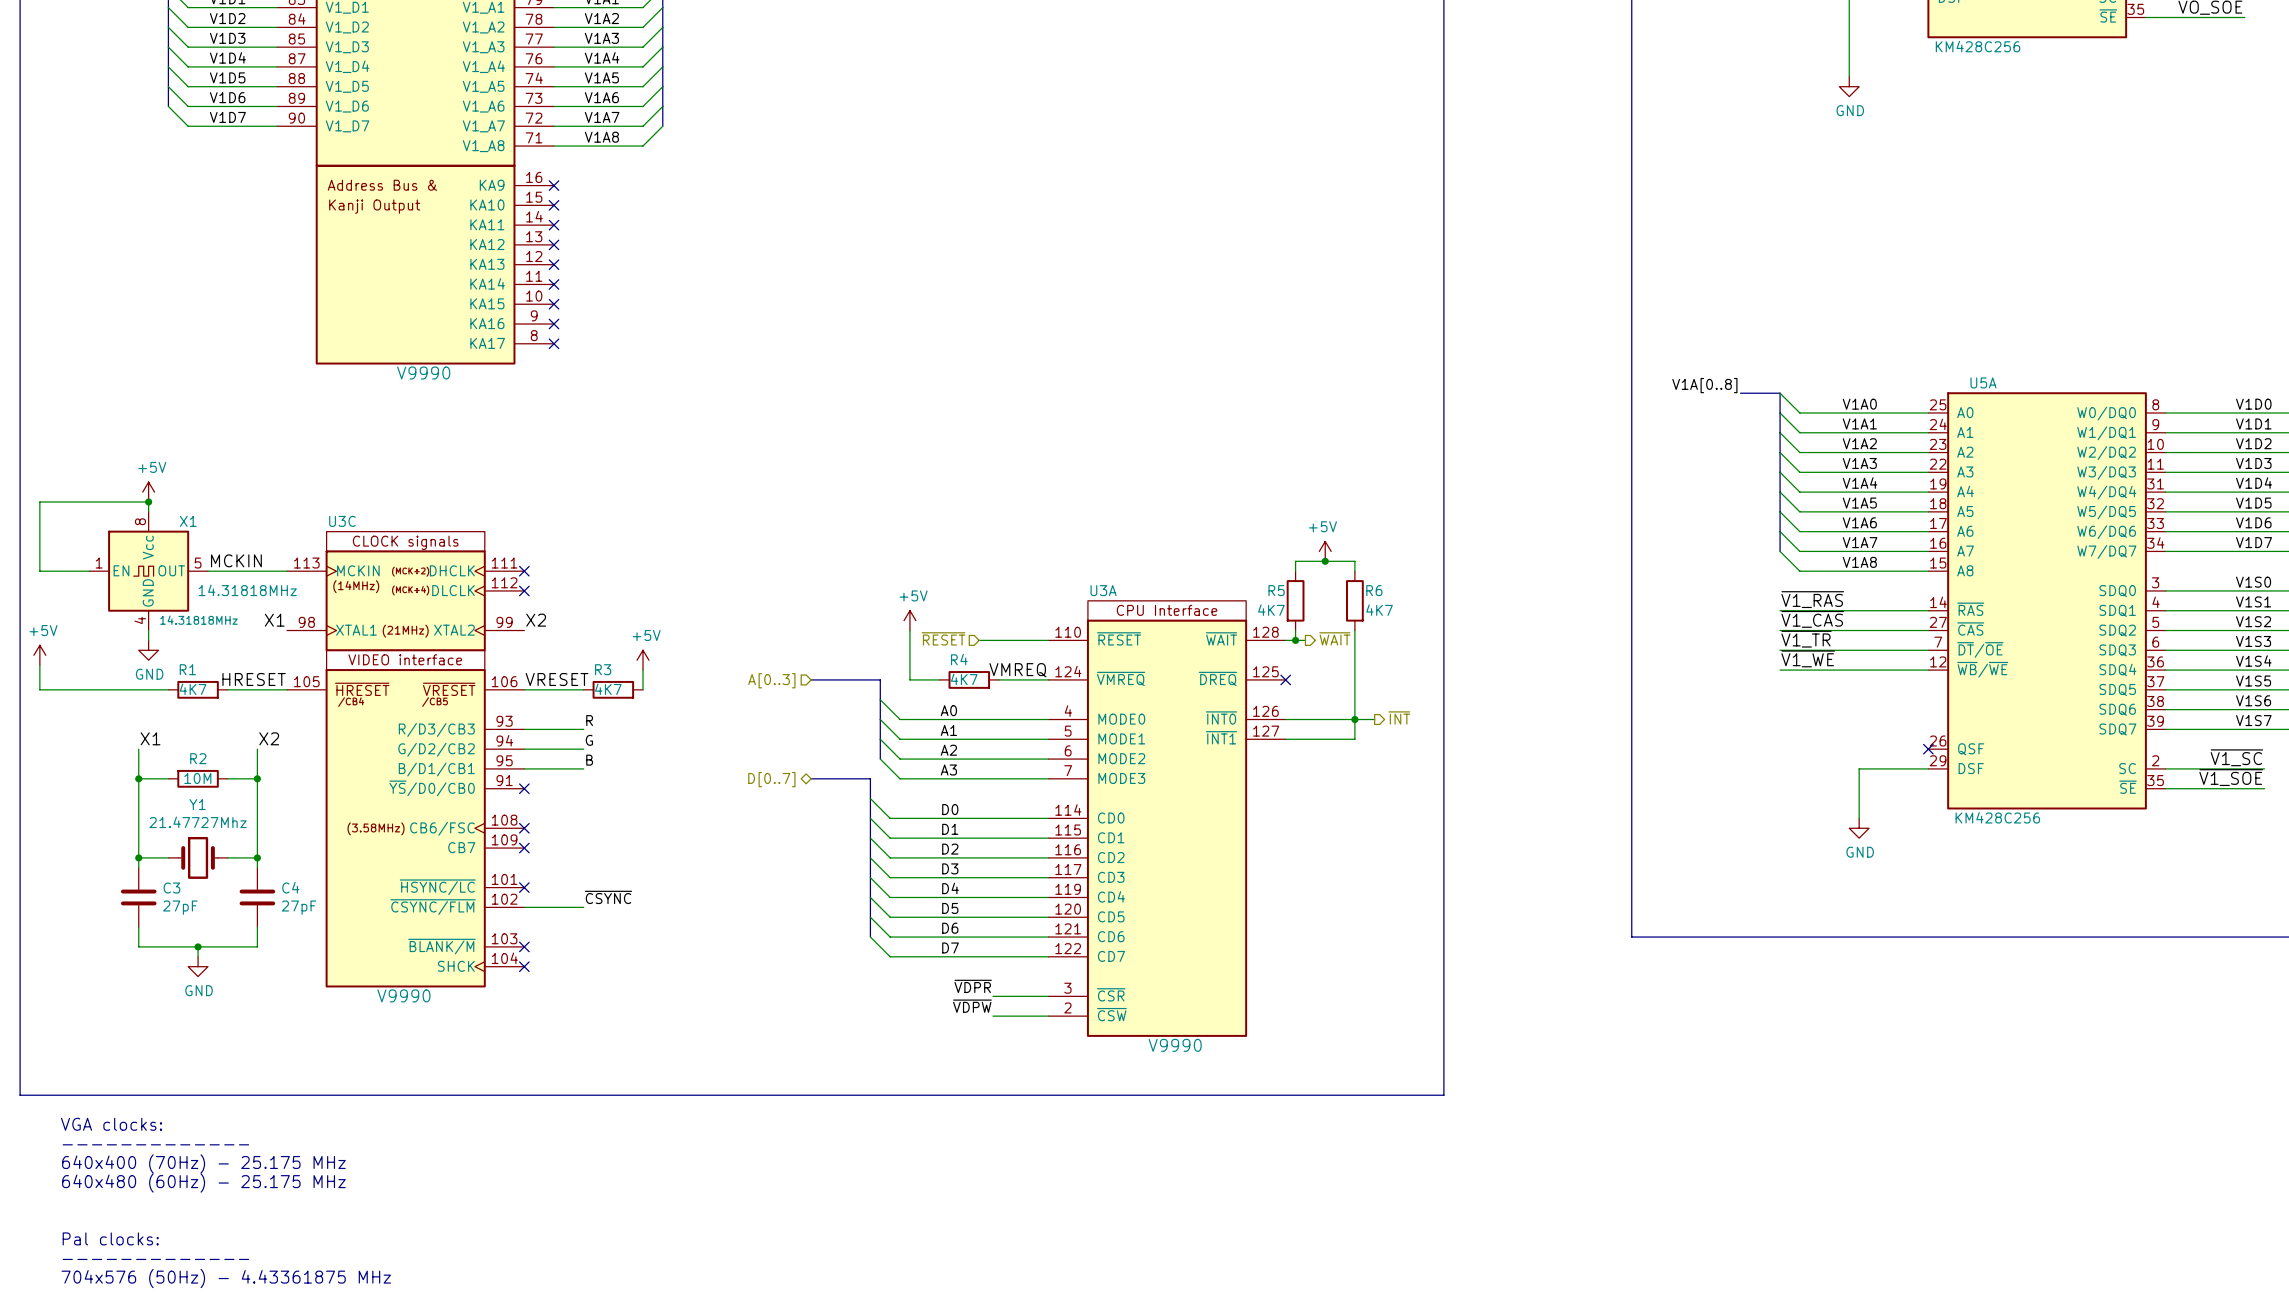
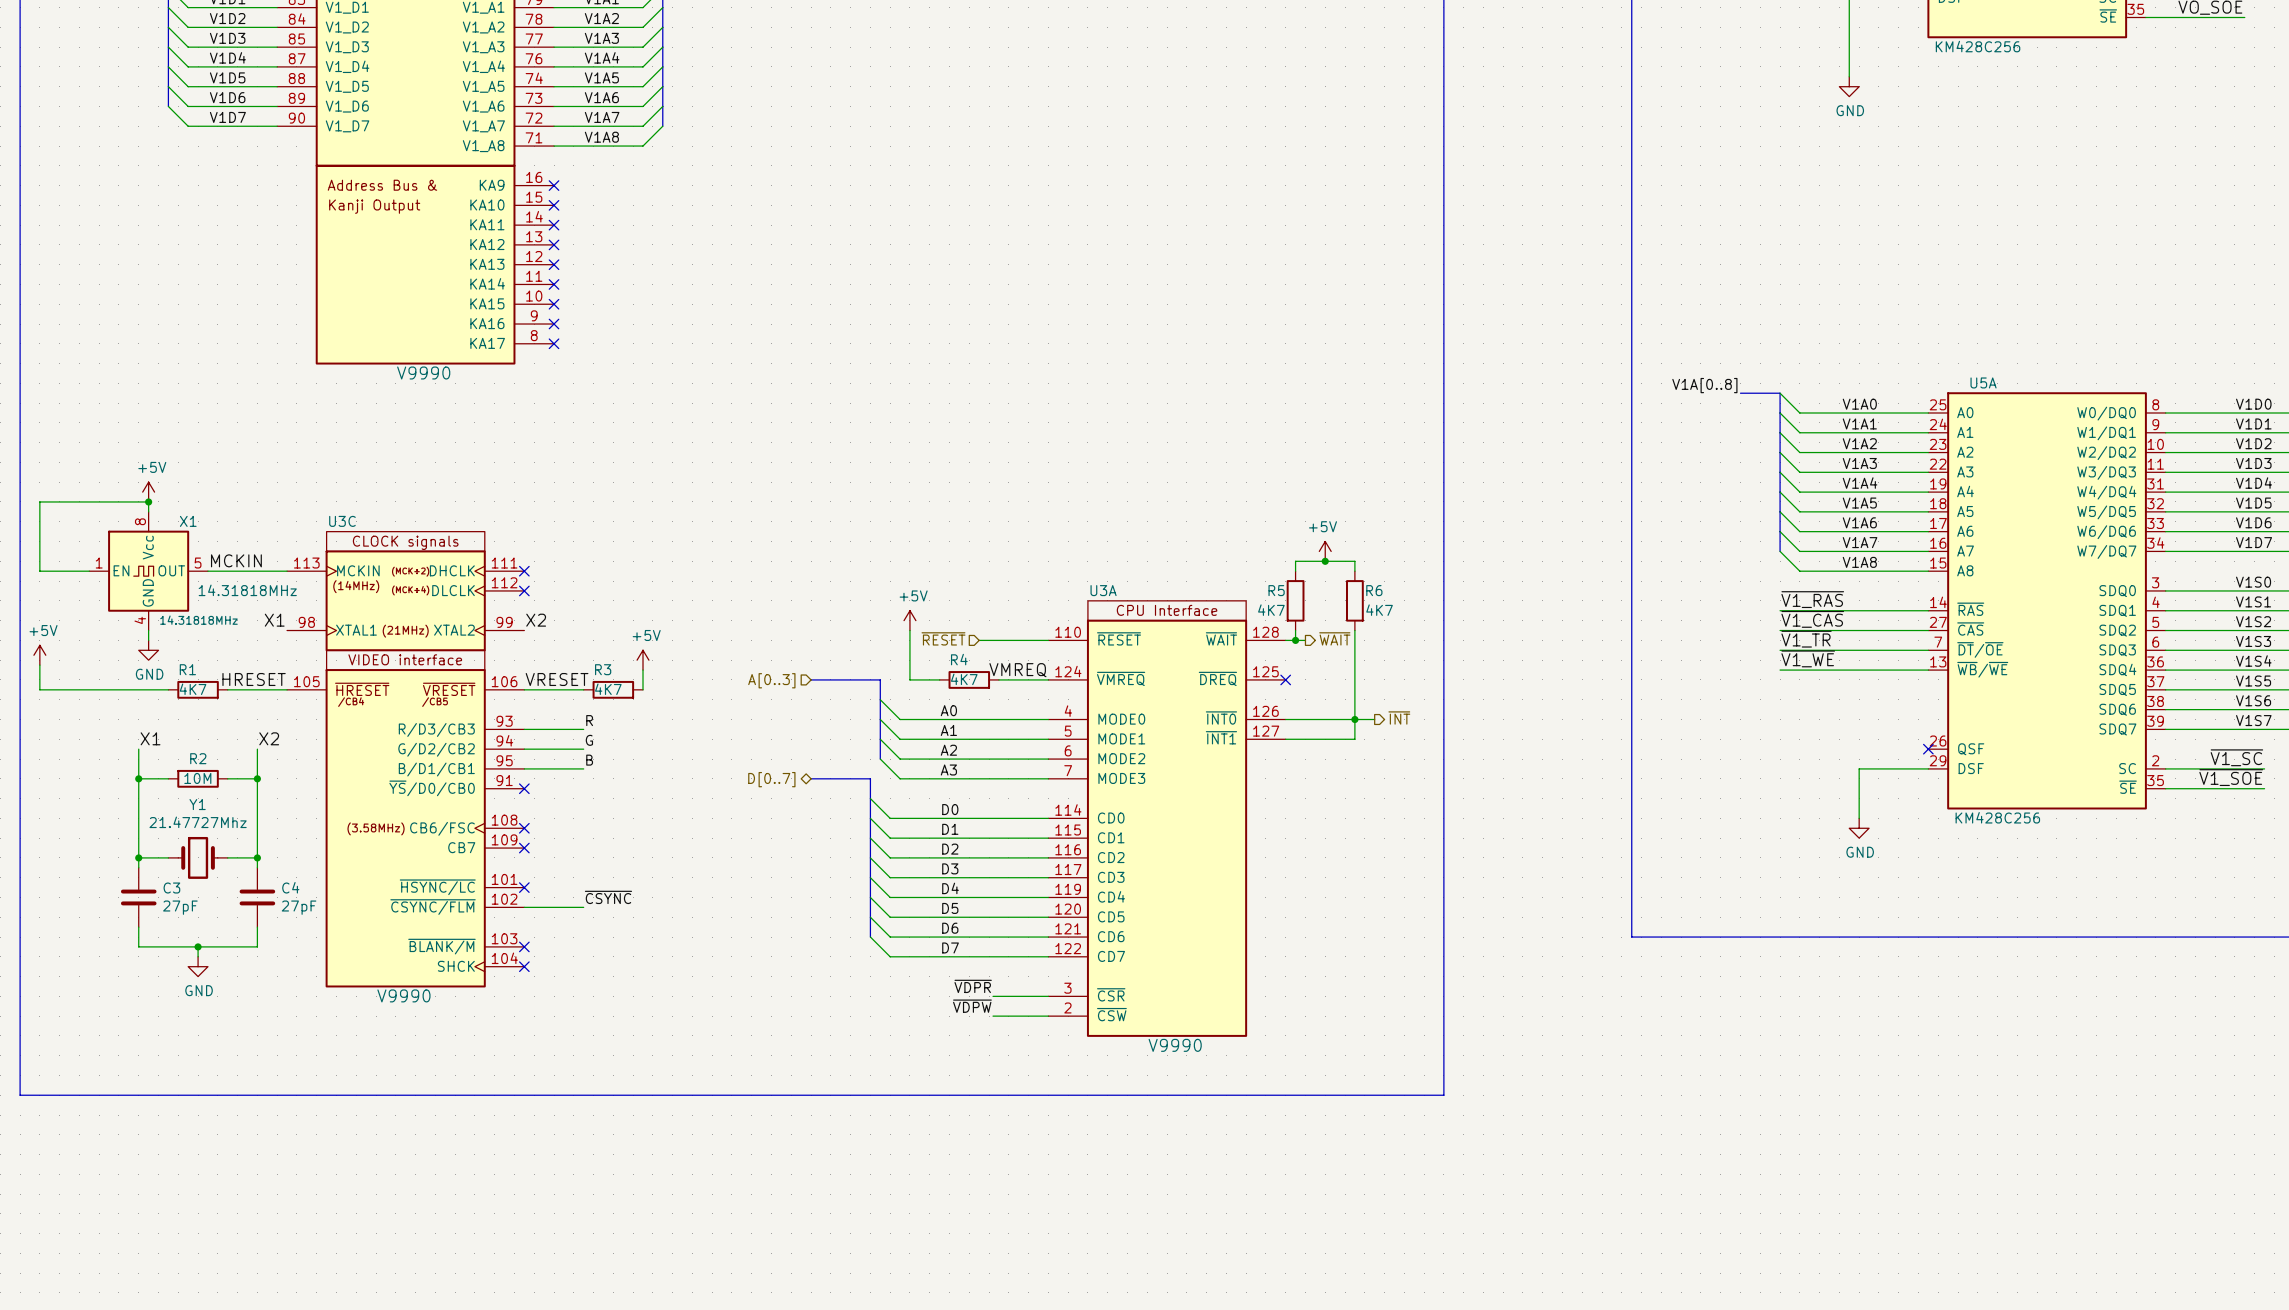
U5A pin number: 12 (1938, 661) -> 13 (1938, 661)
text: VGA clocks: (111, 1124) -> none
text: ------------- (155, 1144) -> none
text: 640x400 (70Hz) - 25.175 MHz (203, 1163) -> none
text: 640x480 (60Hz) - 25.175 MHz (203, 1183) -> none
text: Pal clocks: (110, 1238) -> none
text: ------------- (155, 1259) -> none
text: 704x576 (50Hz) - 4.43361875 MHz (226, 1278) -> none

